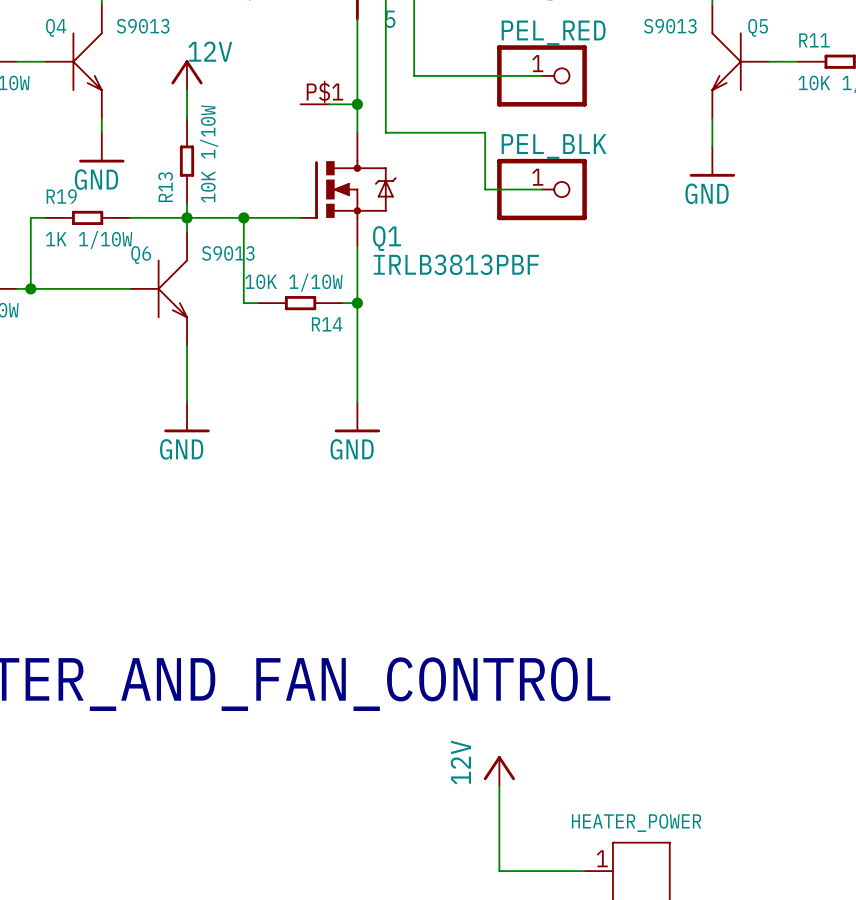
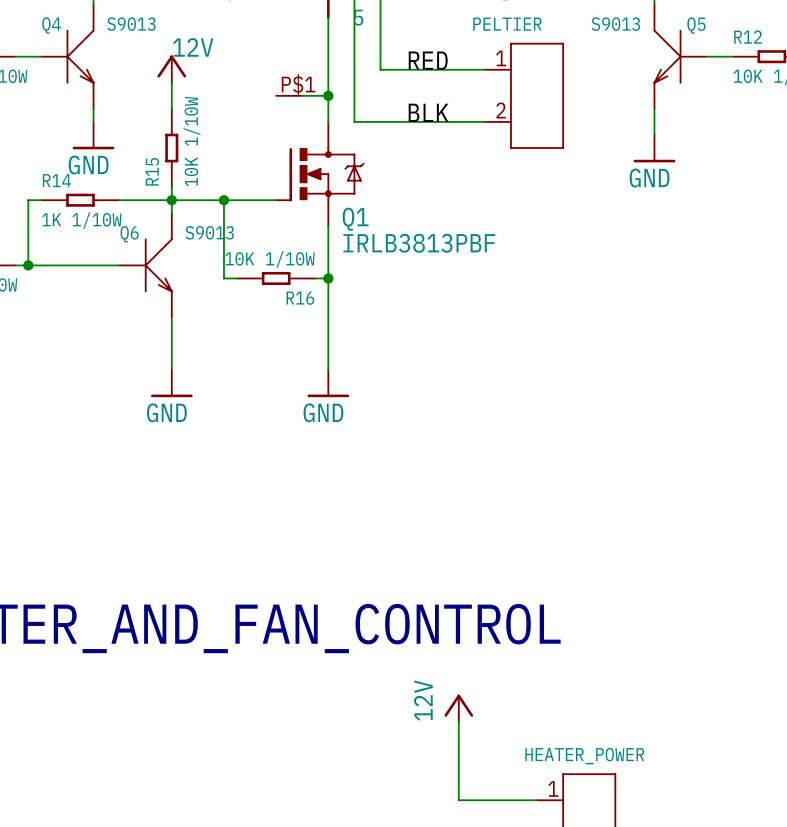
R11 name: R11 (814, 40) -> R12 (748, 37)
label: none -> RED (428, 60)
PEL_RED: (541, 75) -> none
PELTIER: none -> (524, 95)
label: none -> BLK (428, 112)
wire: (485, 132) (485, 189) (541, 189) -> (445, 121) (484, 121)
R13 name: R13 (165, 187) -> R15 (152, 171)
PEL_BLK: (541, 189) -> none
R19 name: R19 (61, 196) -> R14 (56, 180)
R14 name: R14 (327, 324) -> R16 (300, 298)

